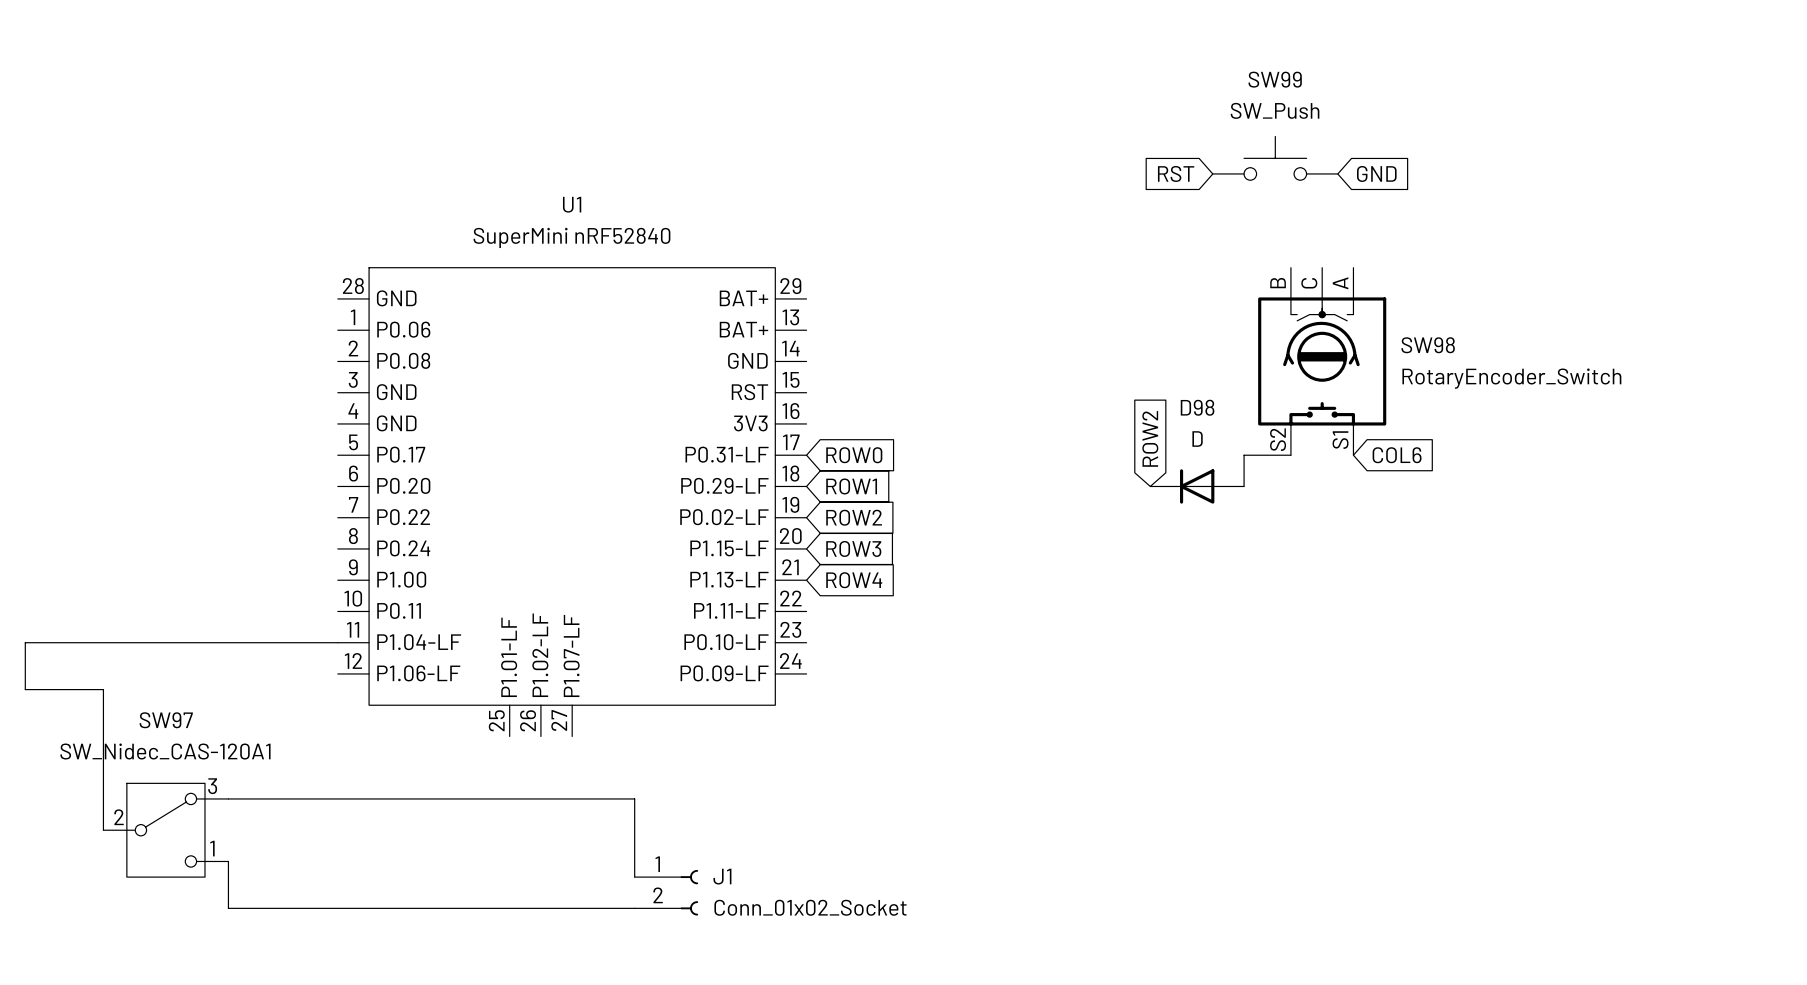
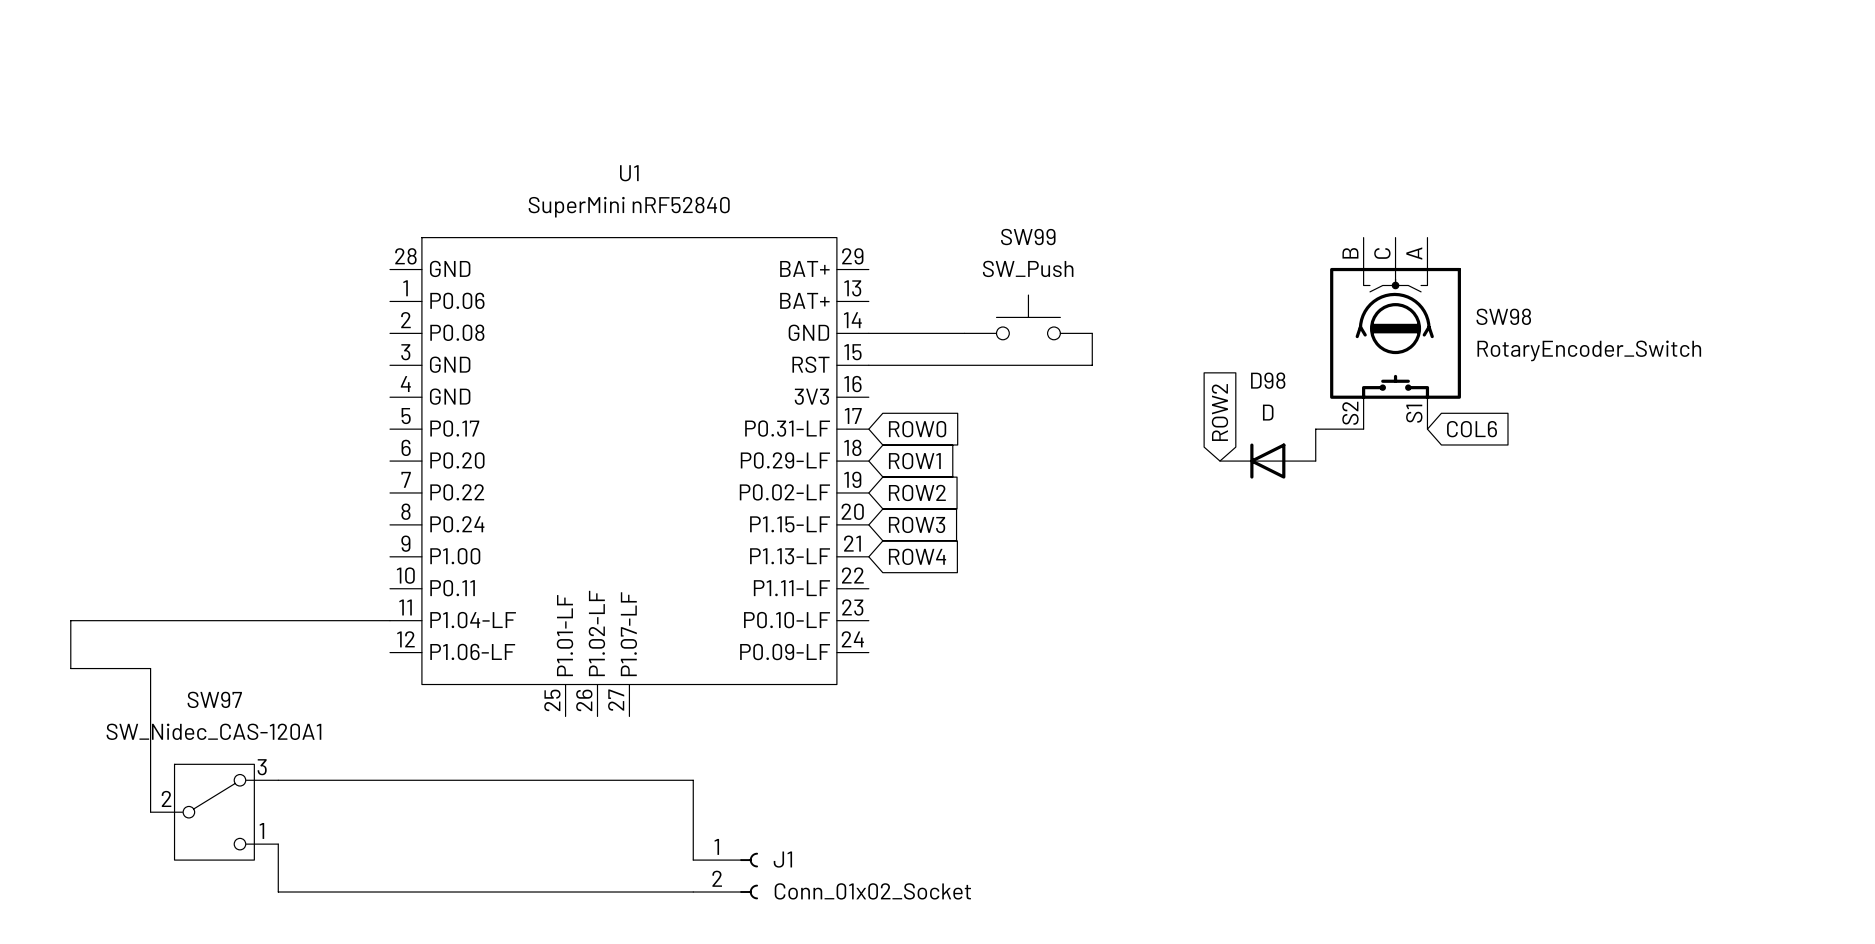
SW99 position: (1275, 158) -> (1028, 317)
global label: RST (1176, 173) -> none
global label: GND (1376, 173) -> none
wire: none -> (868, 333) (964, 333)
wire: none -> (1092, 333) (1092, 365) (868, 365)

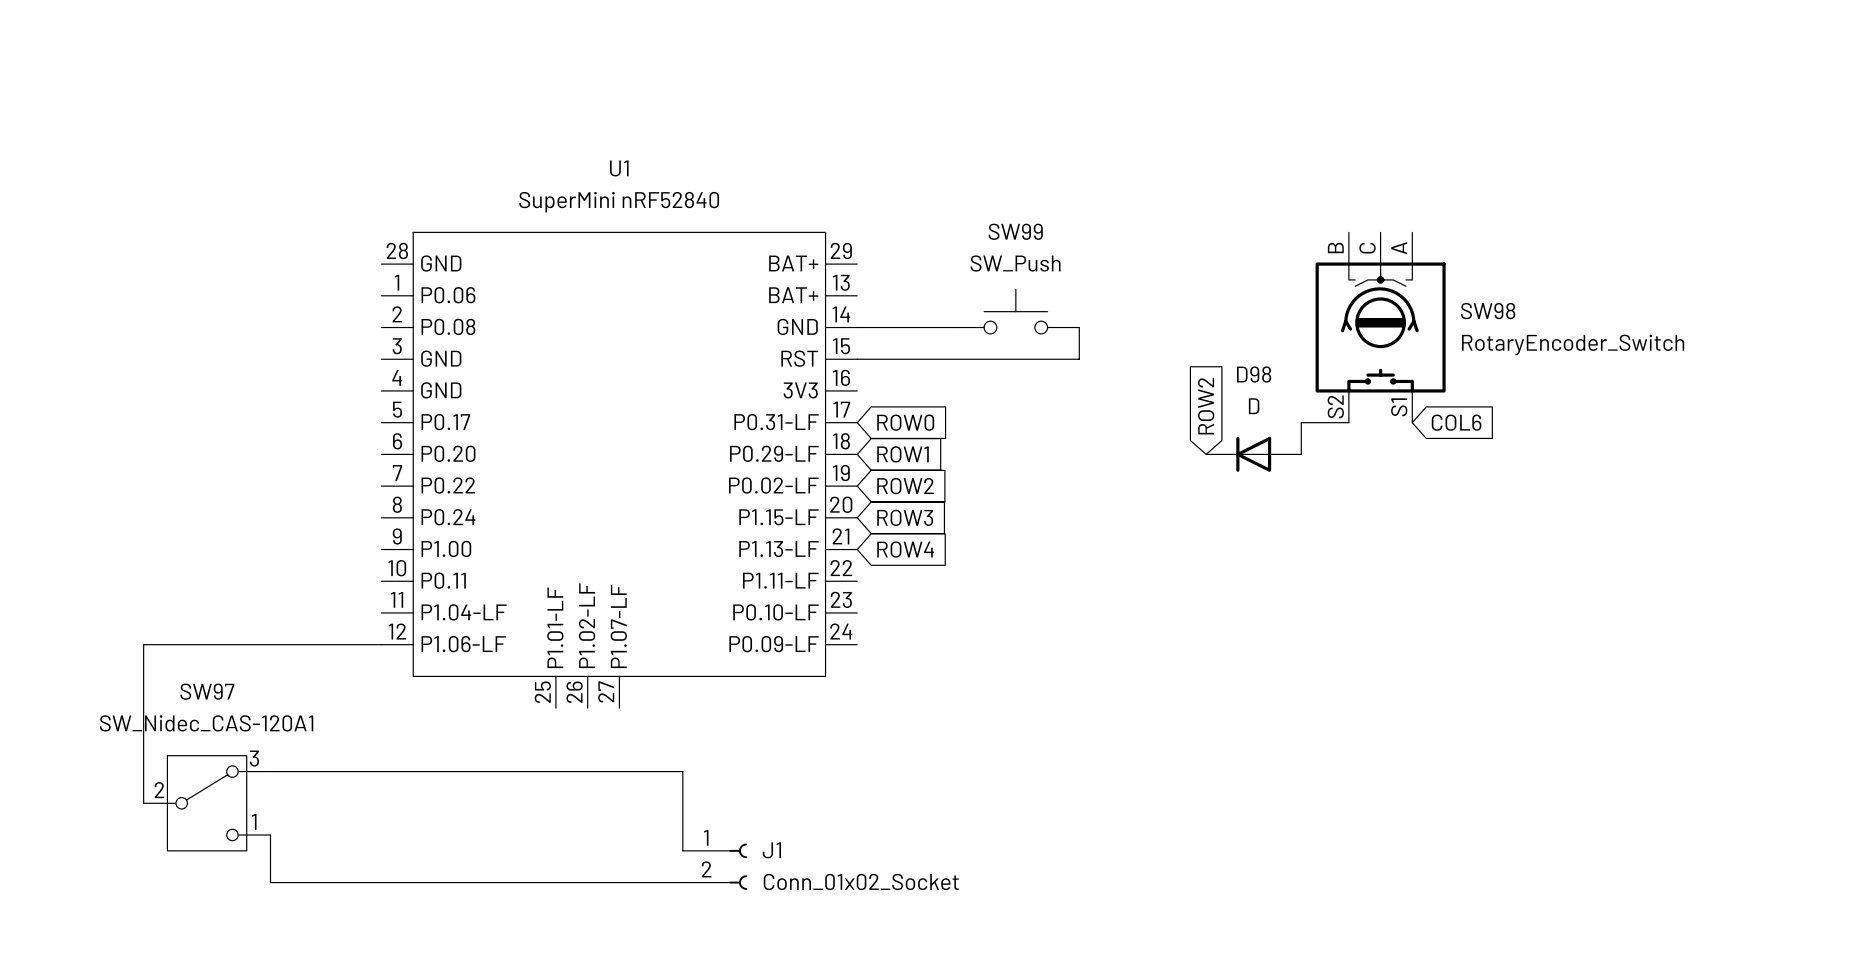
wire: (390, 620) (70, 620) (70, 668) (150, 668) -> (381, 644) (143, 644) (143, 660)

